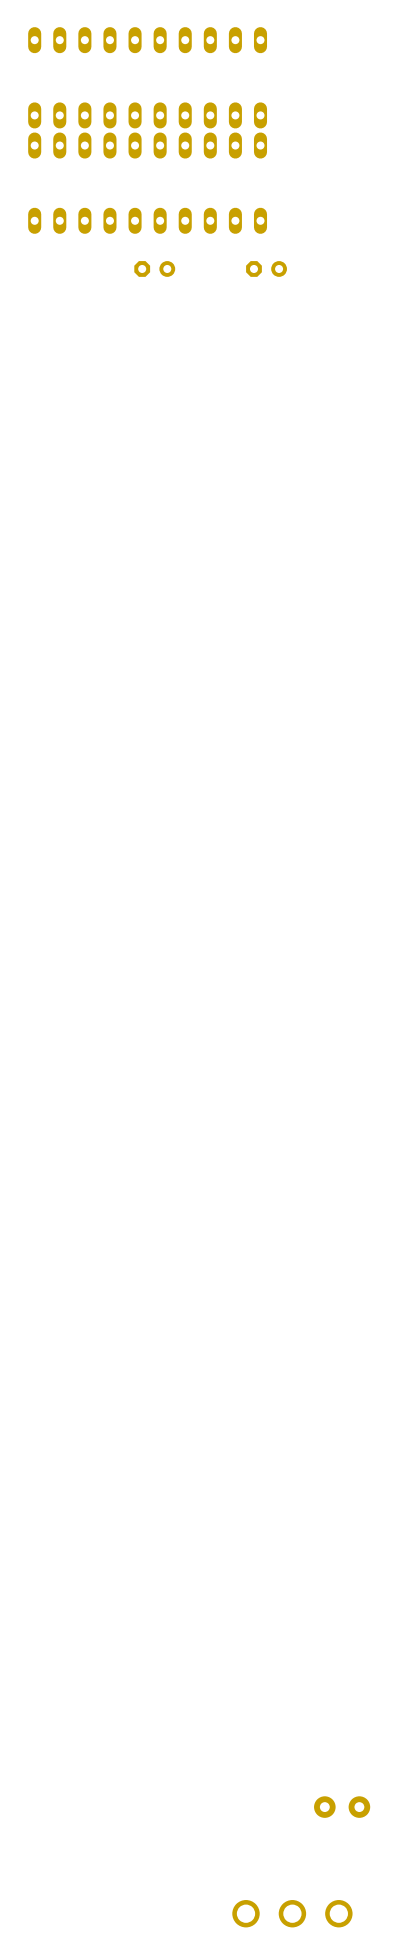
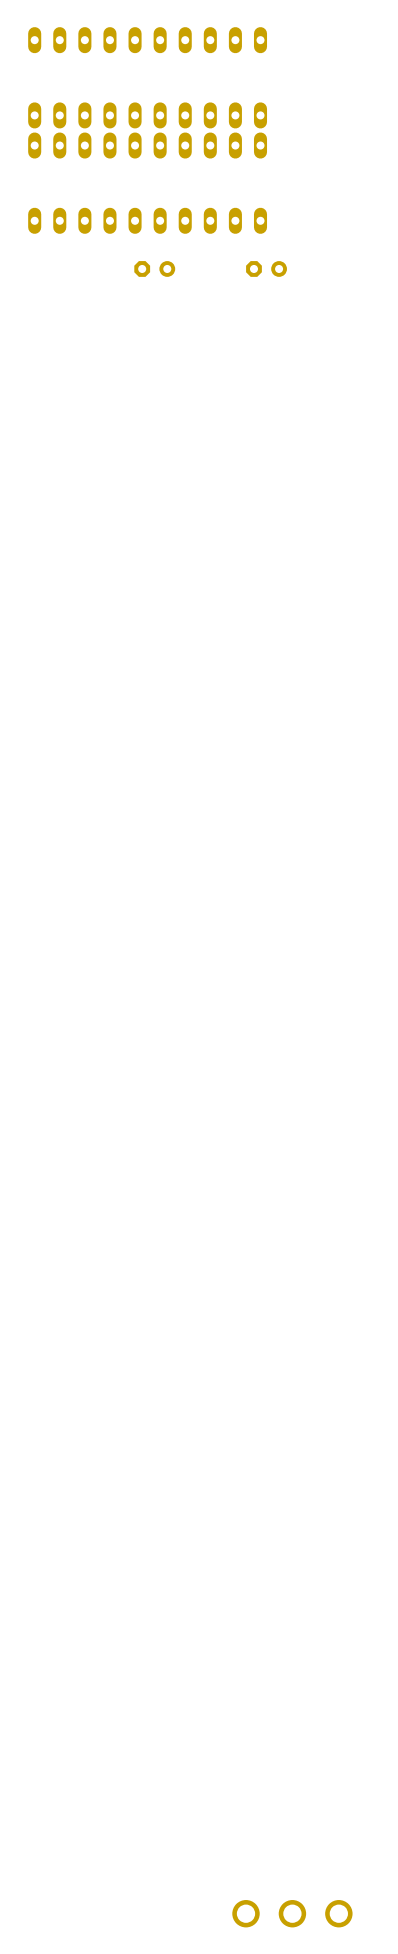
part: (342, 1807) -> none

